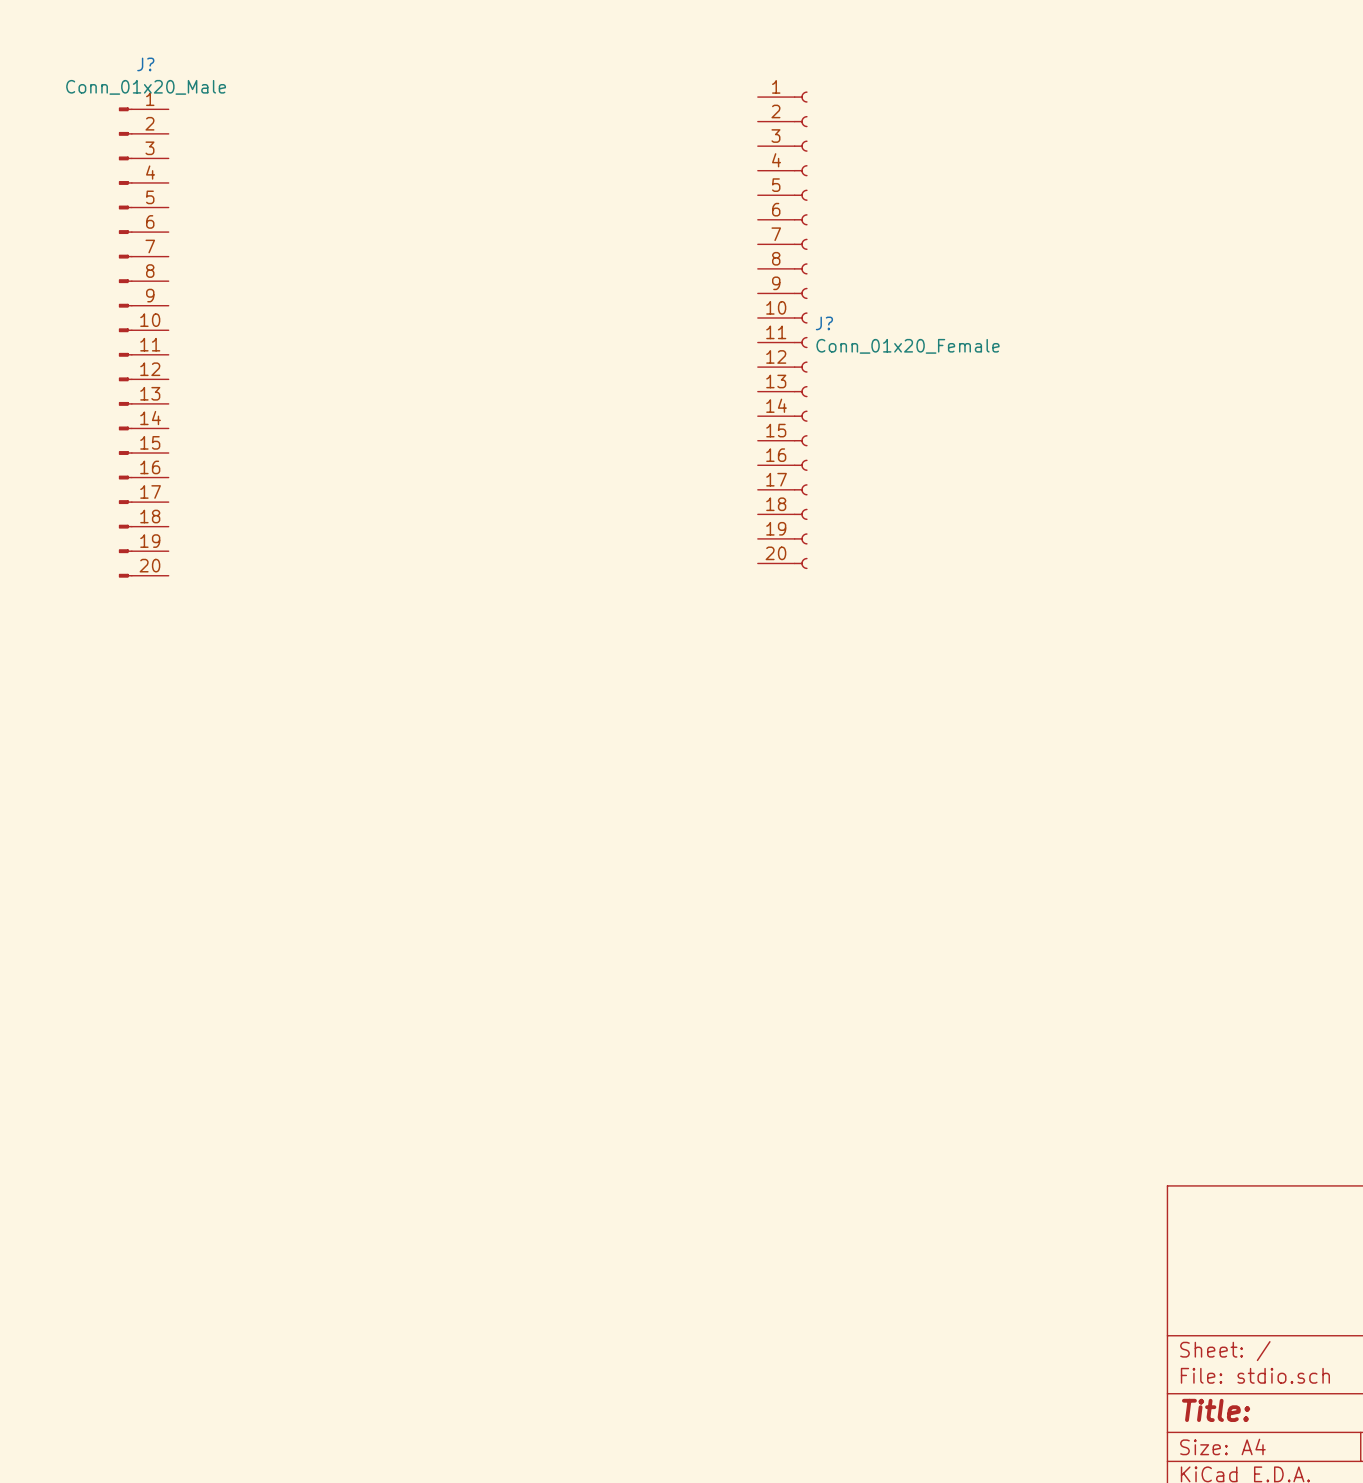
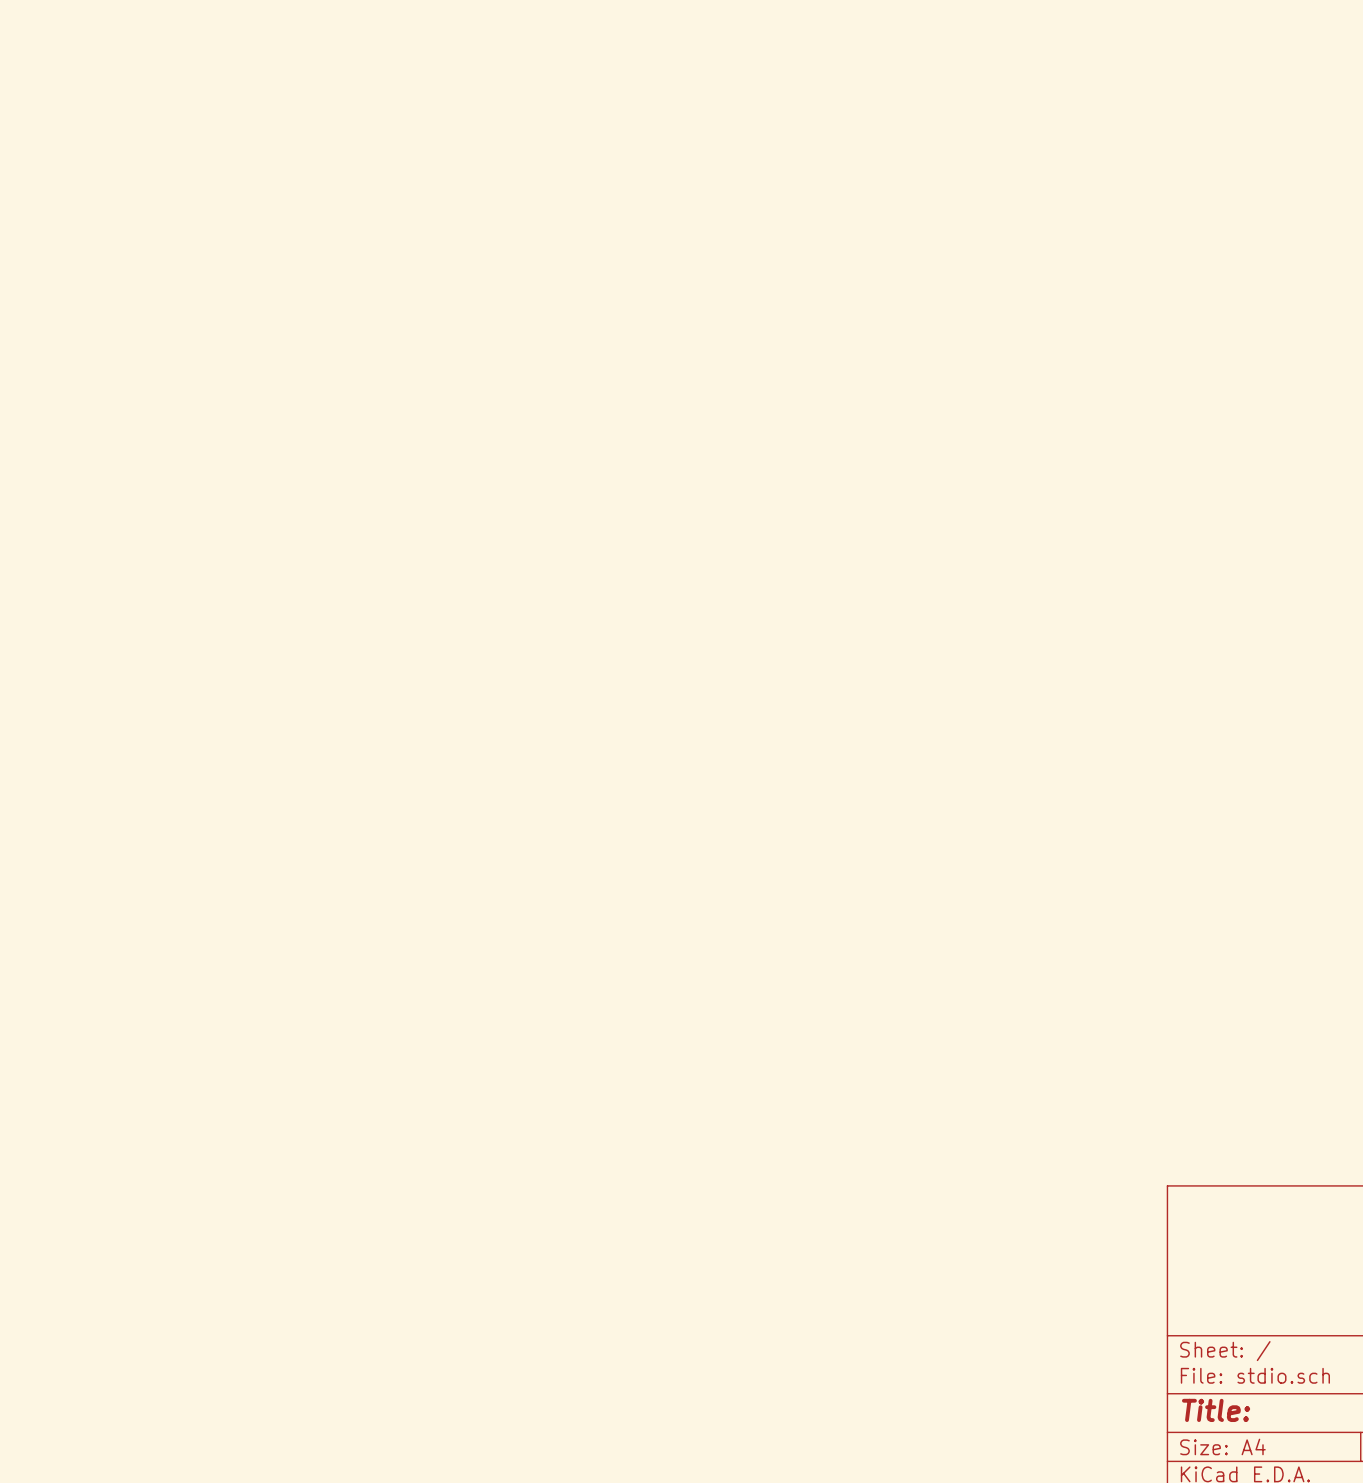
J?: Conn_01x20_Female (782, 330) -> none
J?: Conn_01x20_Male (143, 342) -> none

